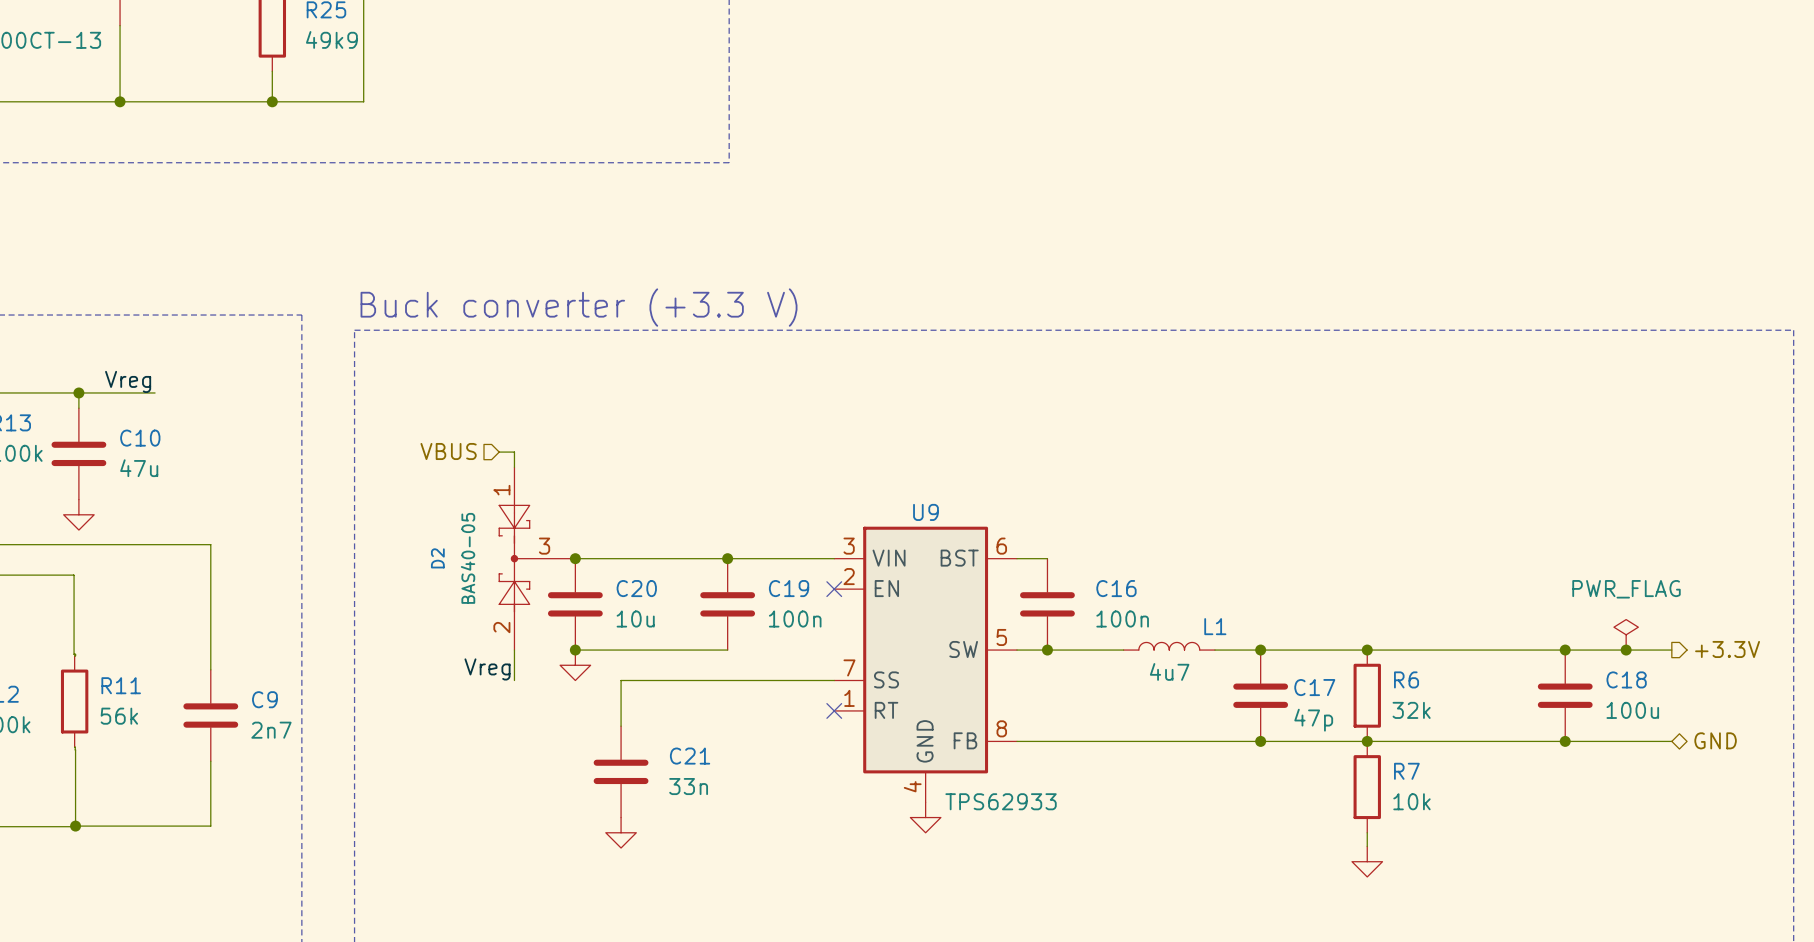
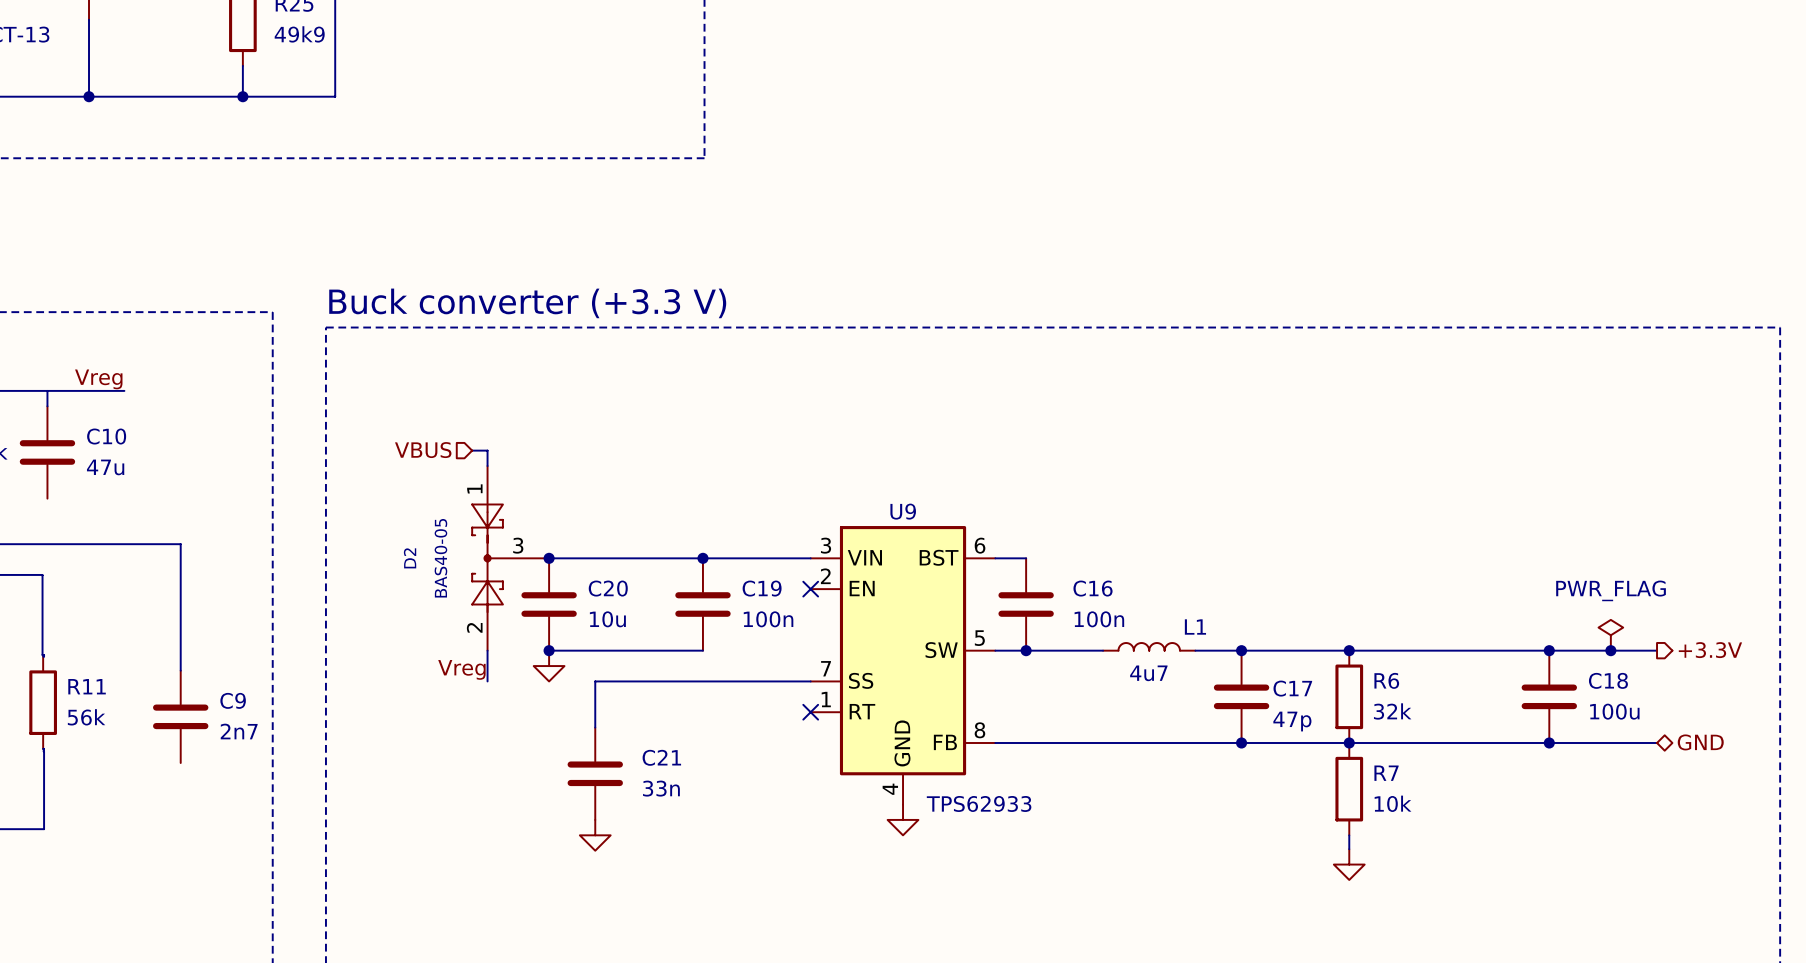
junction: (78, 392) -> none
power symbol: (78, 514) -> none
wire: (210, 761) (210, 826) (75, 826) -> none
junction: (75, 826) -> none

